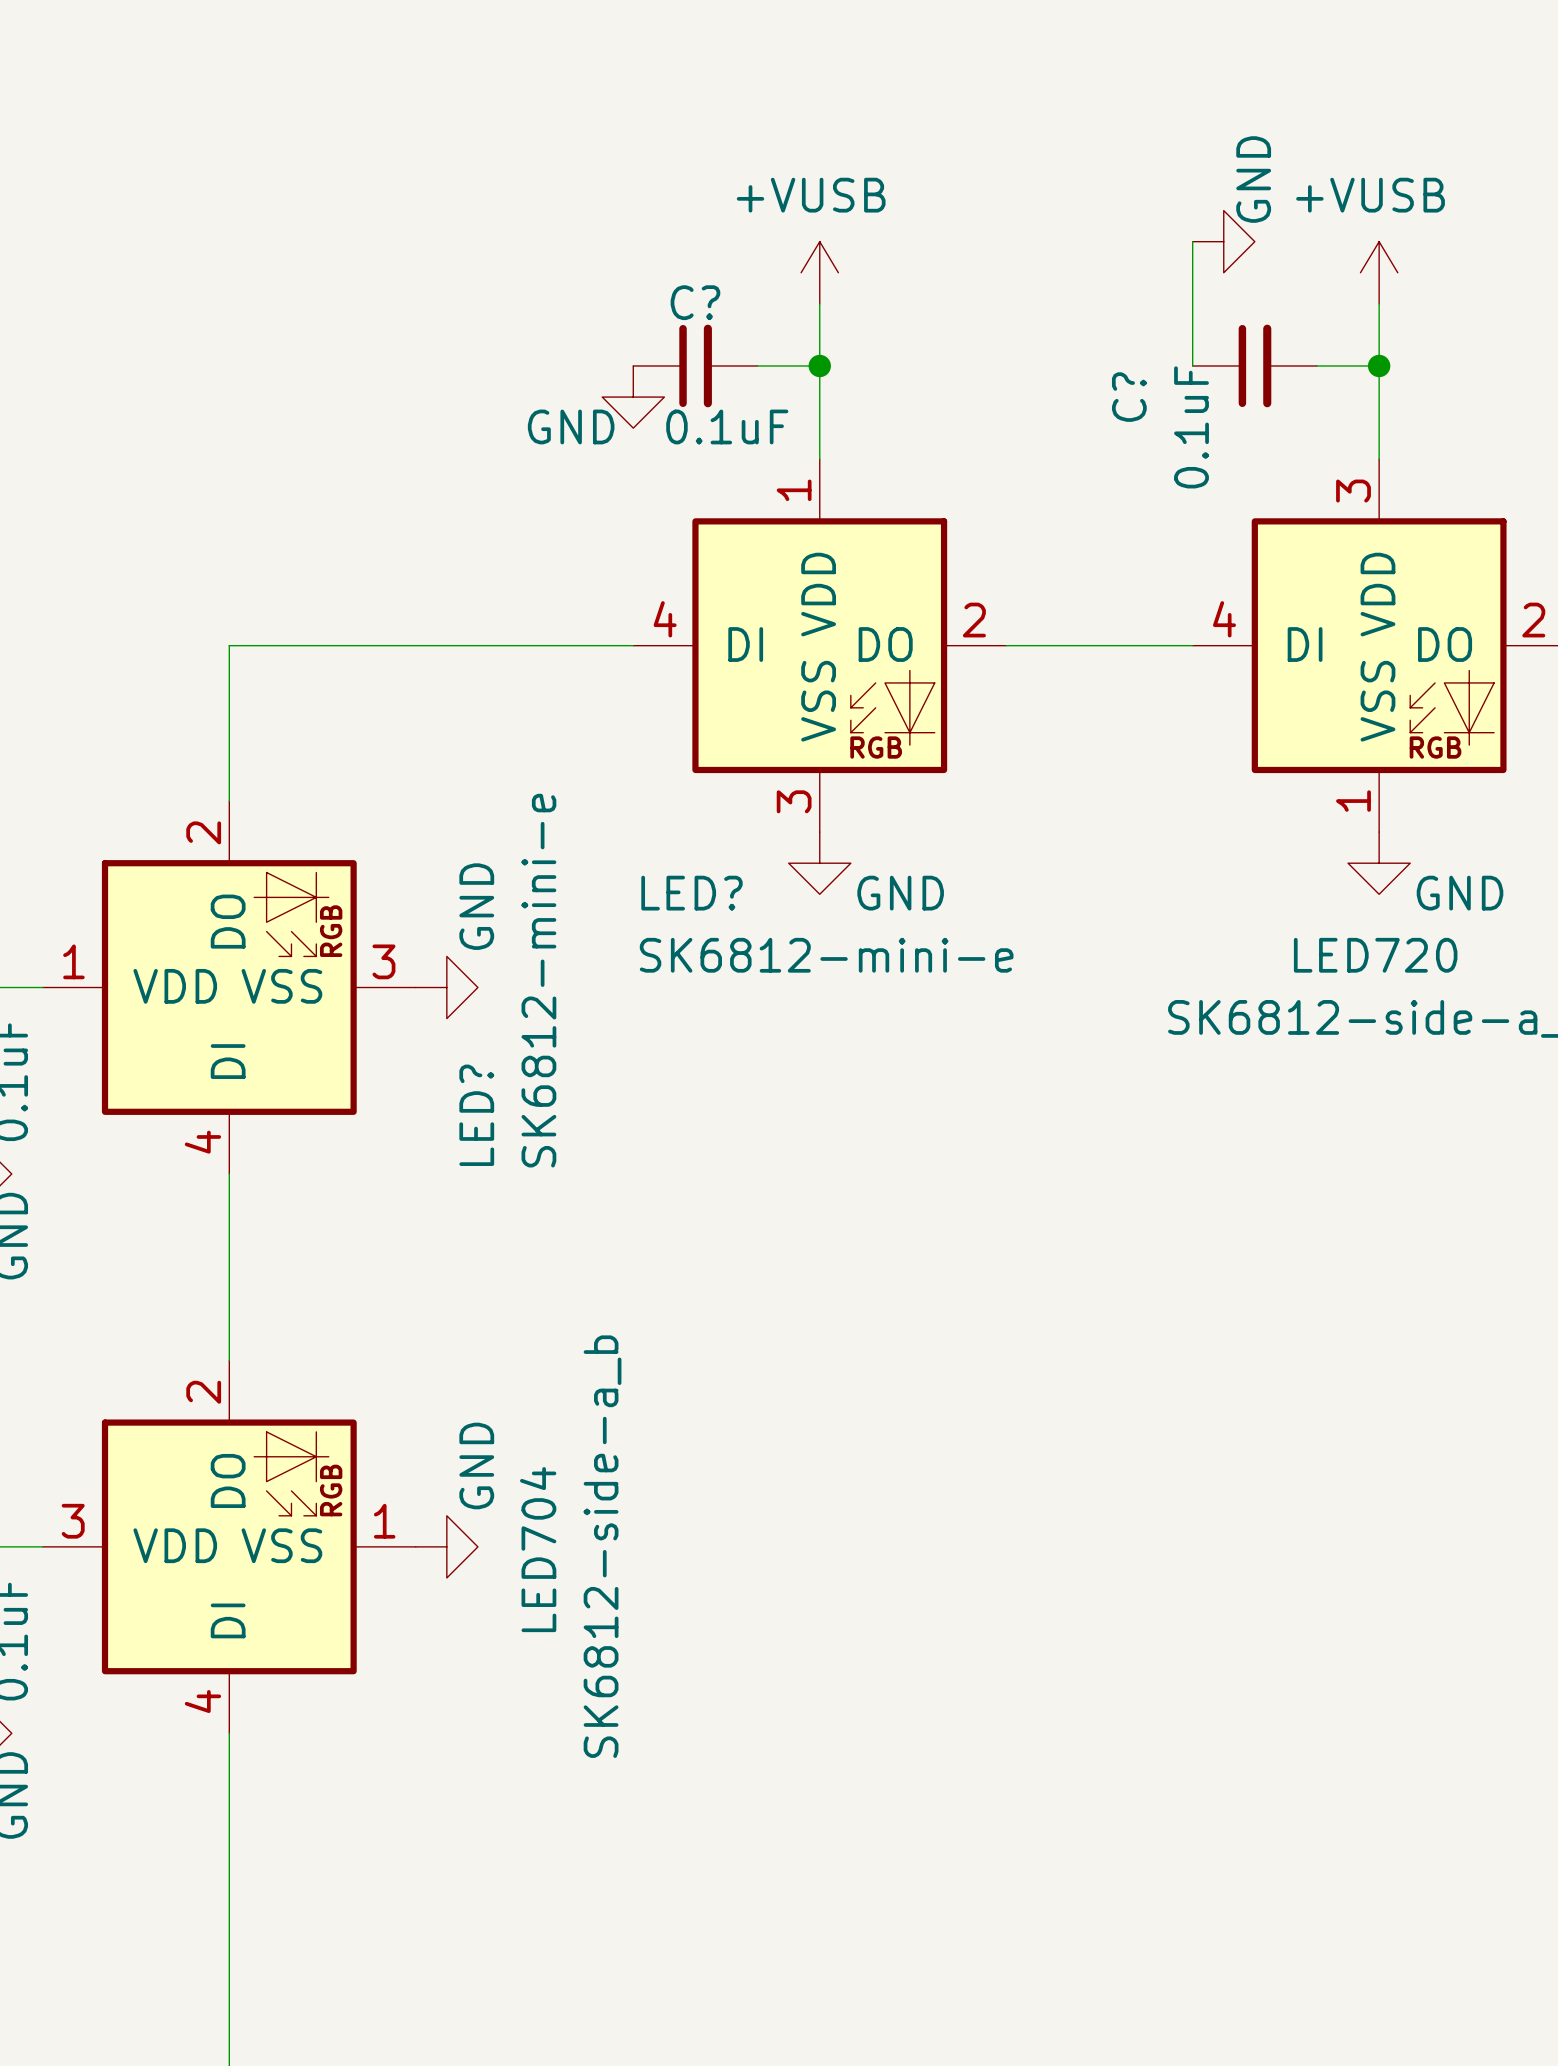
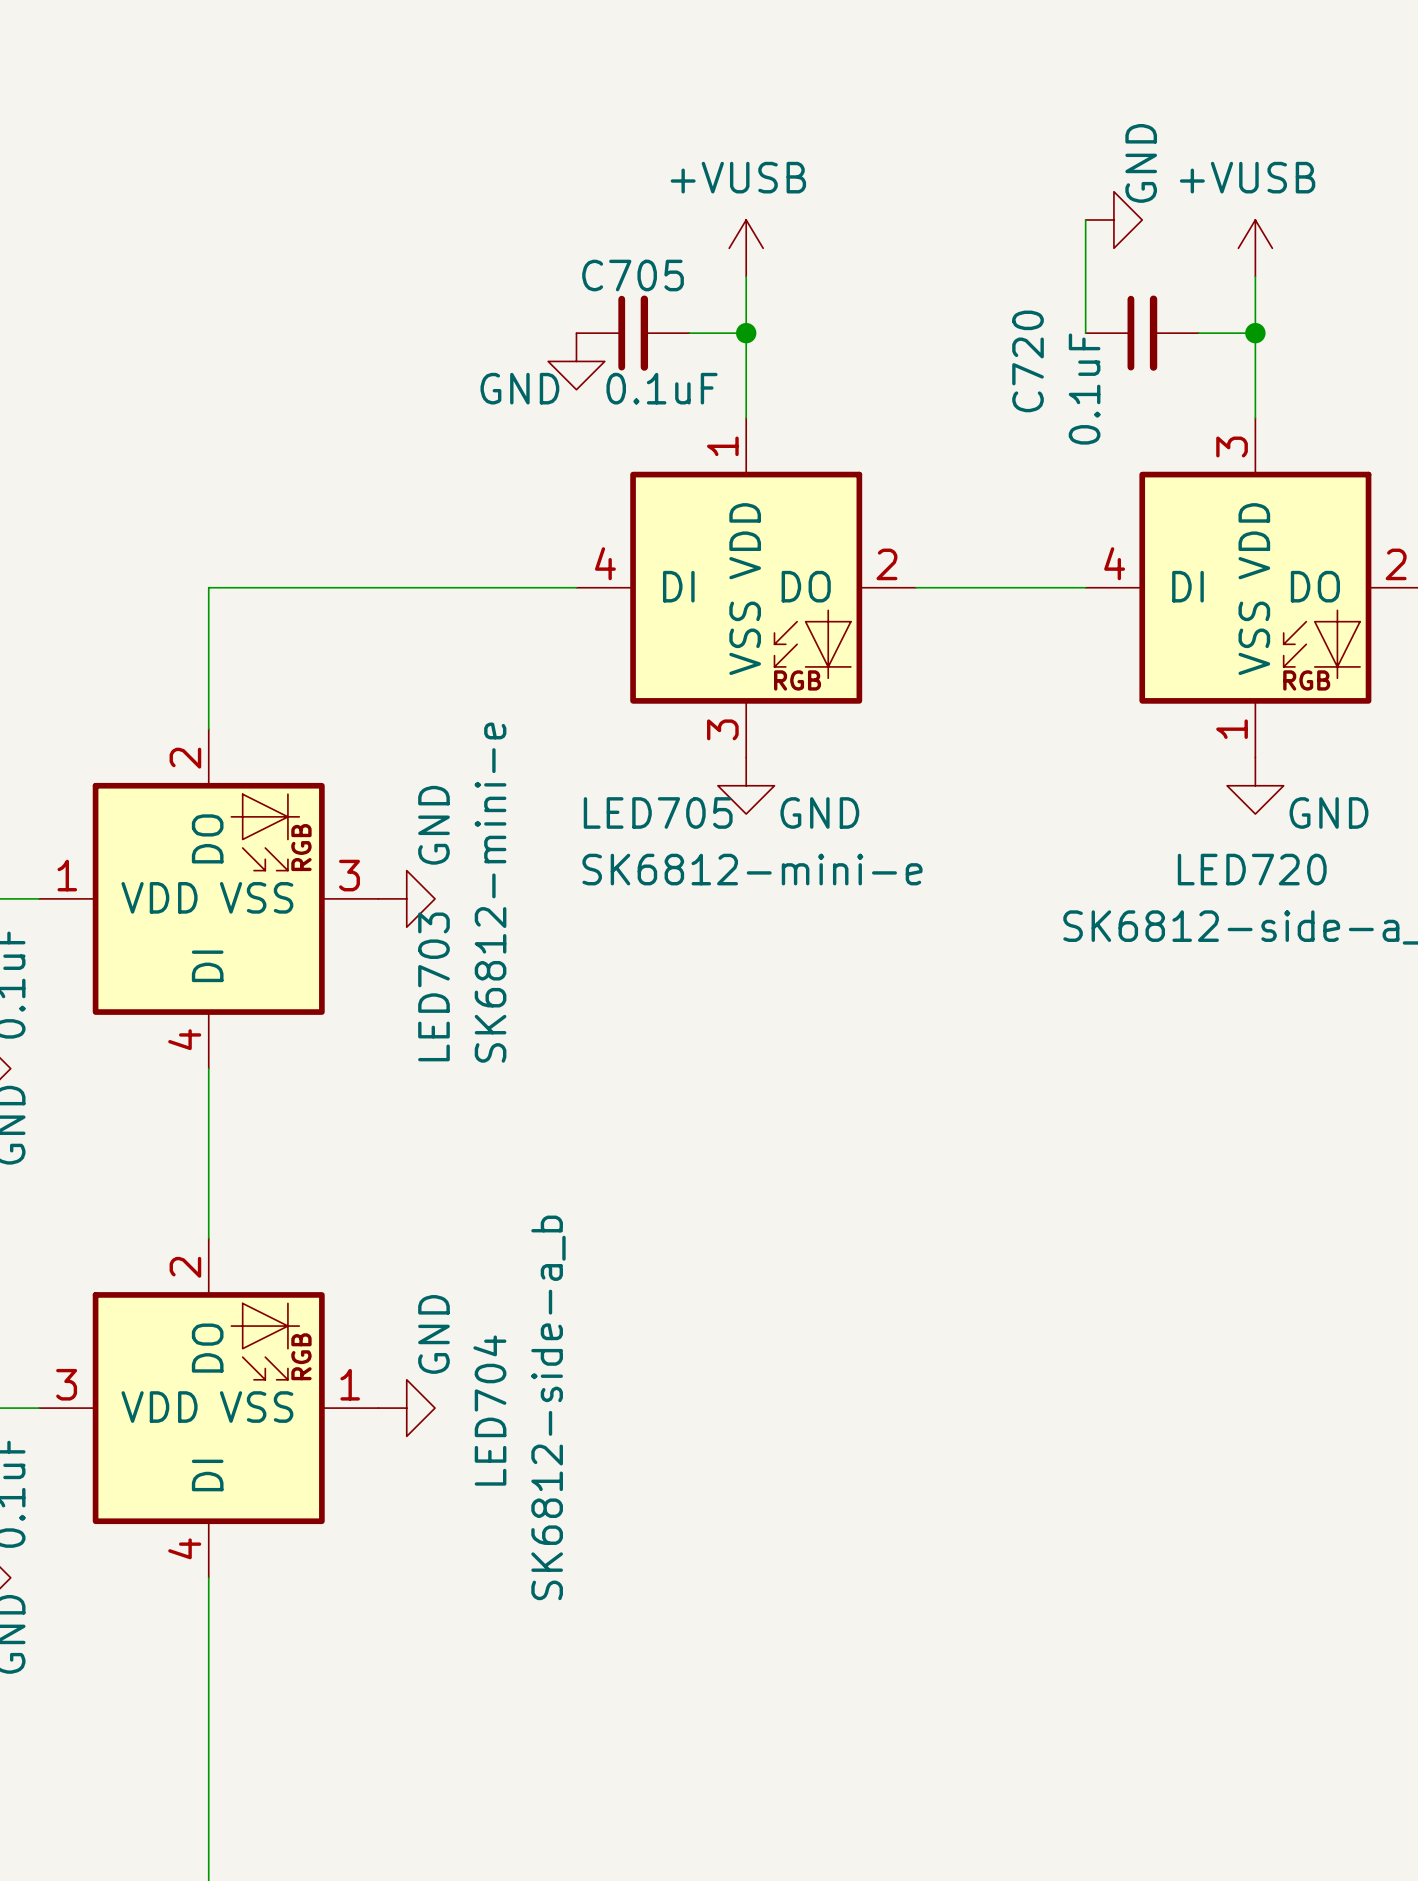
C? name: C? (695, 302) -> C705 (633, 275)
C? name: C? (1129, 397) -> C720 (1028, 361)
LED? name: LED? (691, 893) -> LED705 (658, 812)
LED? name: LED? (476, 1115) -> LED703 (433, 986)

